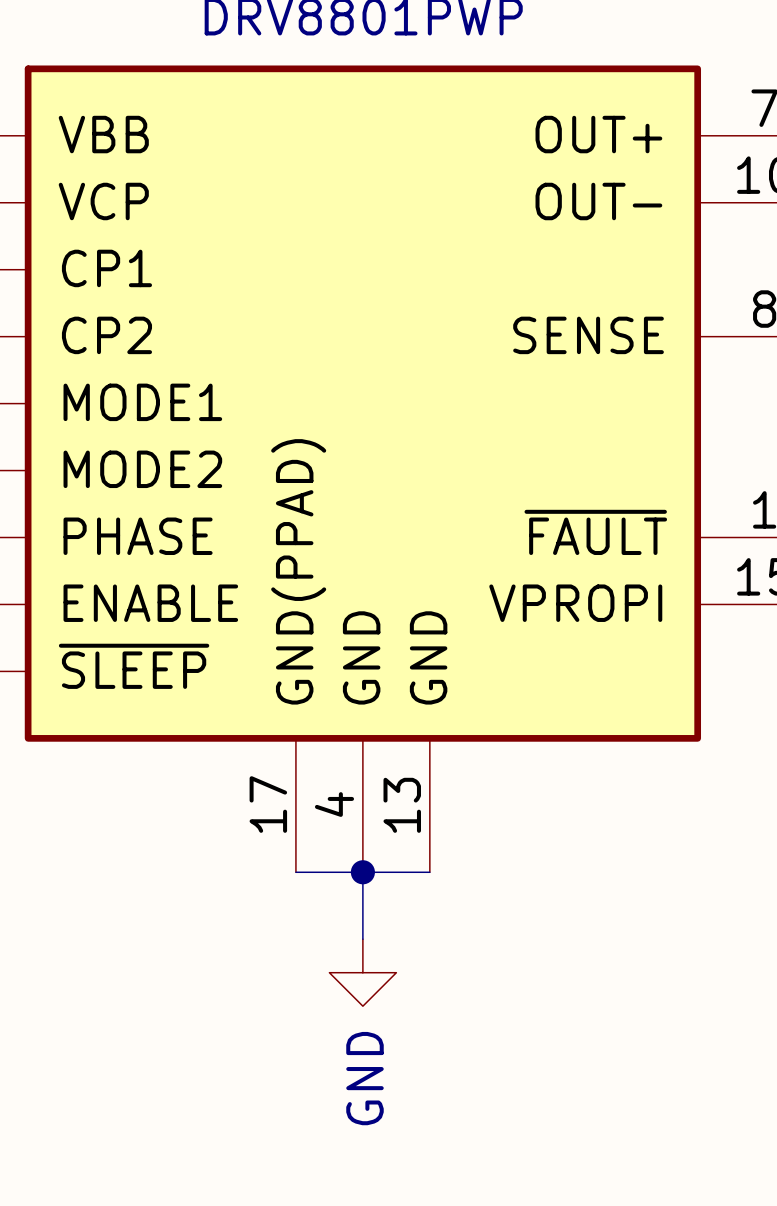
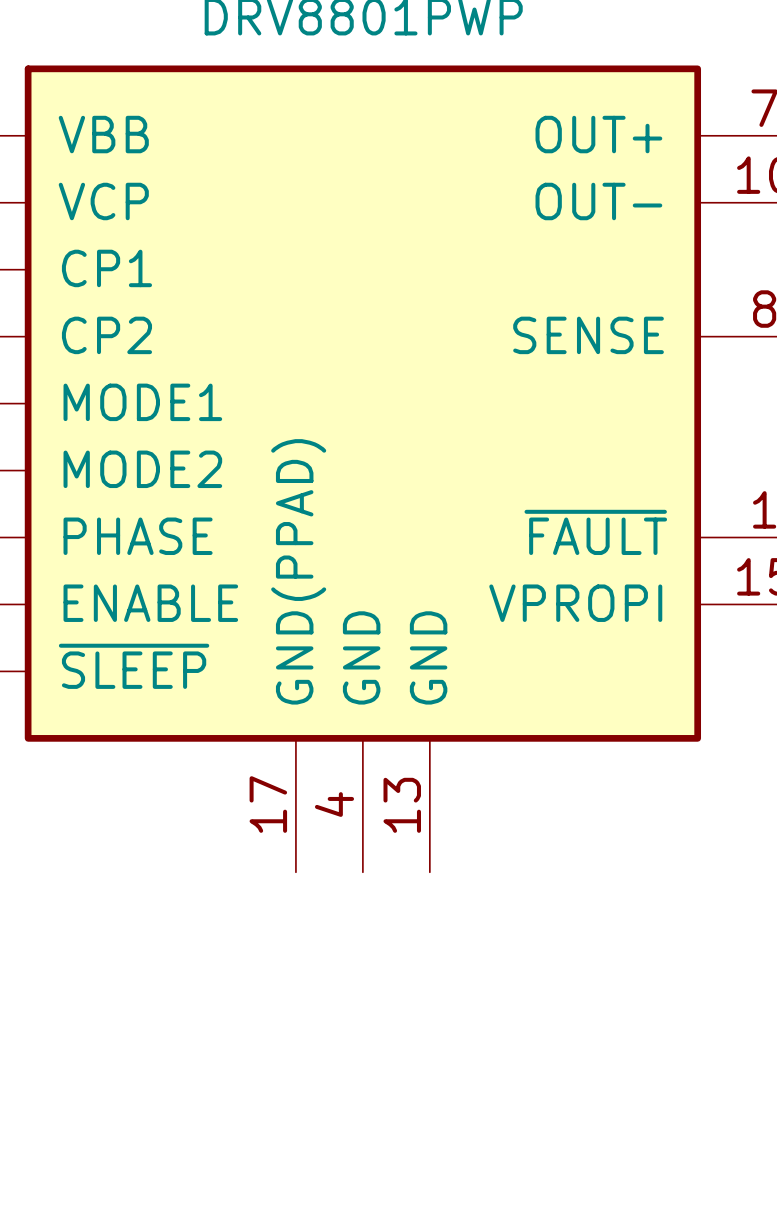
wire: (295, 872) (429, 872) -> none
wire: (362, 872) (362, 939) -> none
junction: (362, 872) -> none
power symbol: GND (362, 972) -> none

